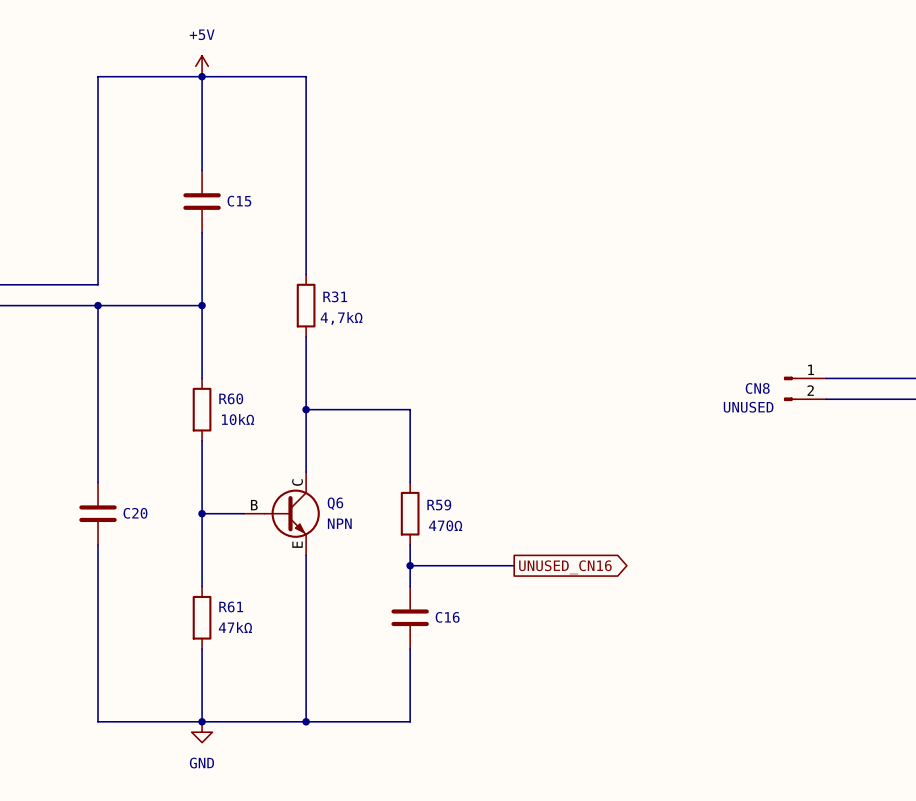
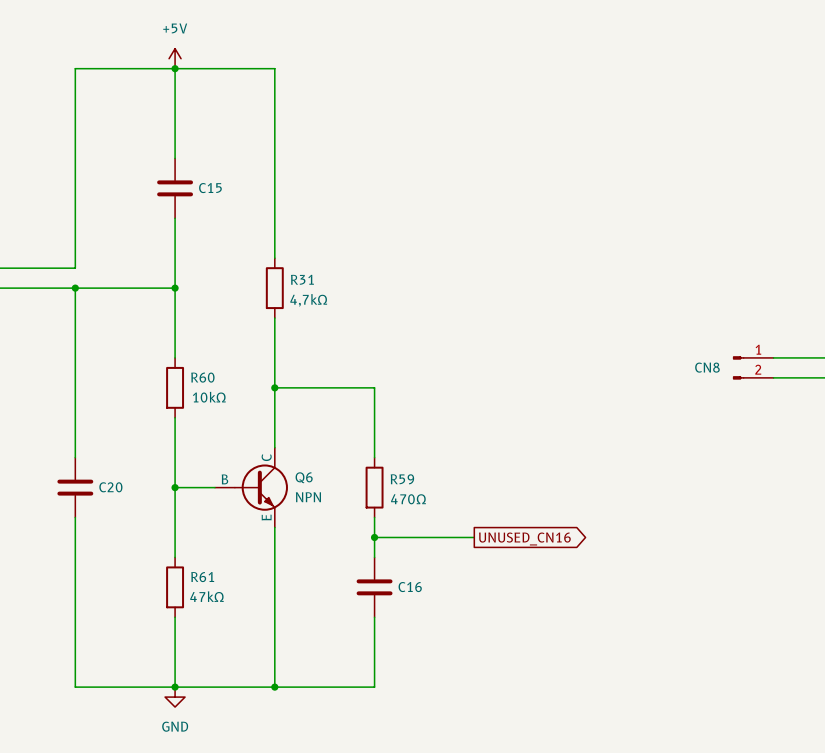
text: UNUSED (748, 407) -> none

